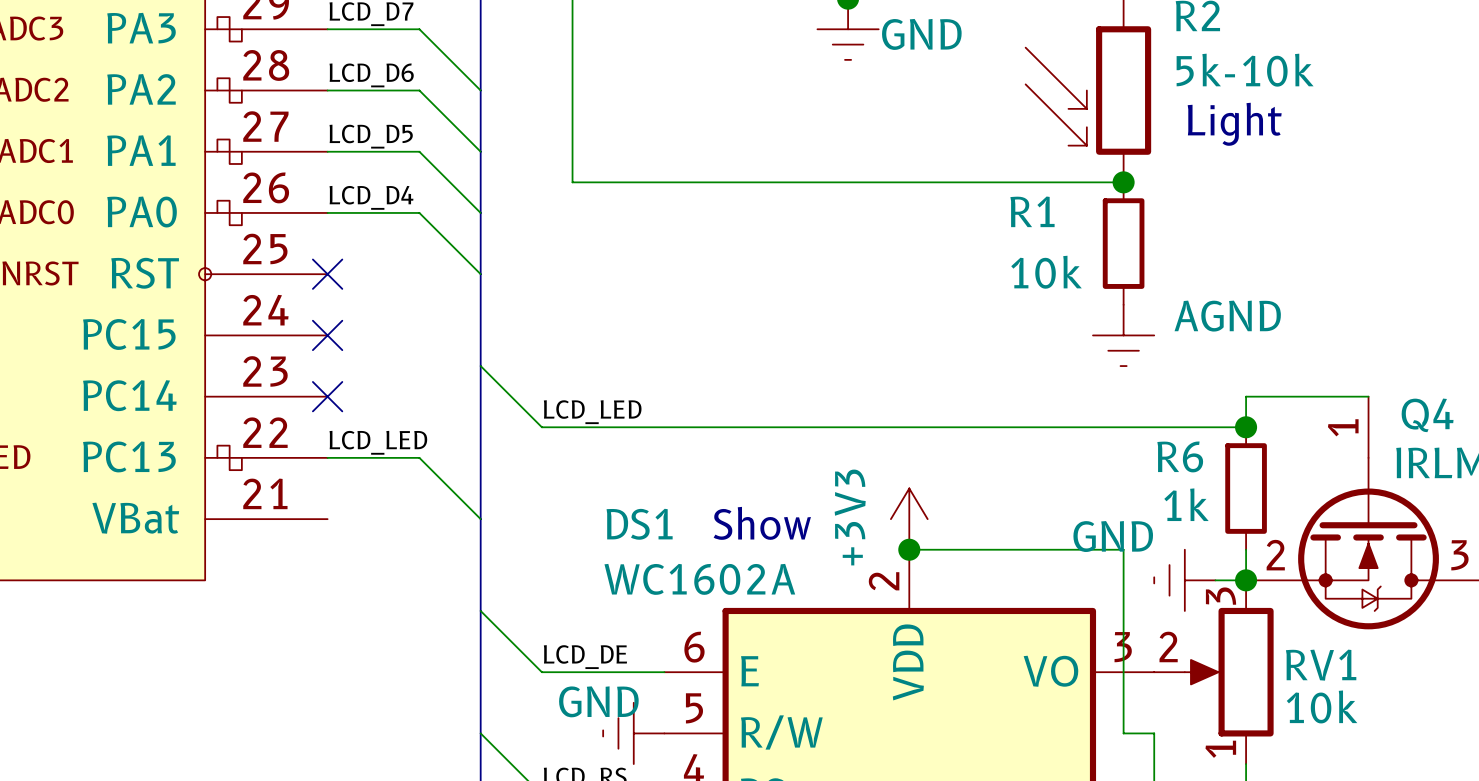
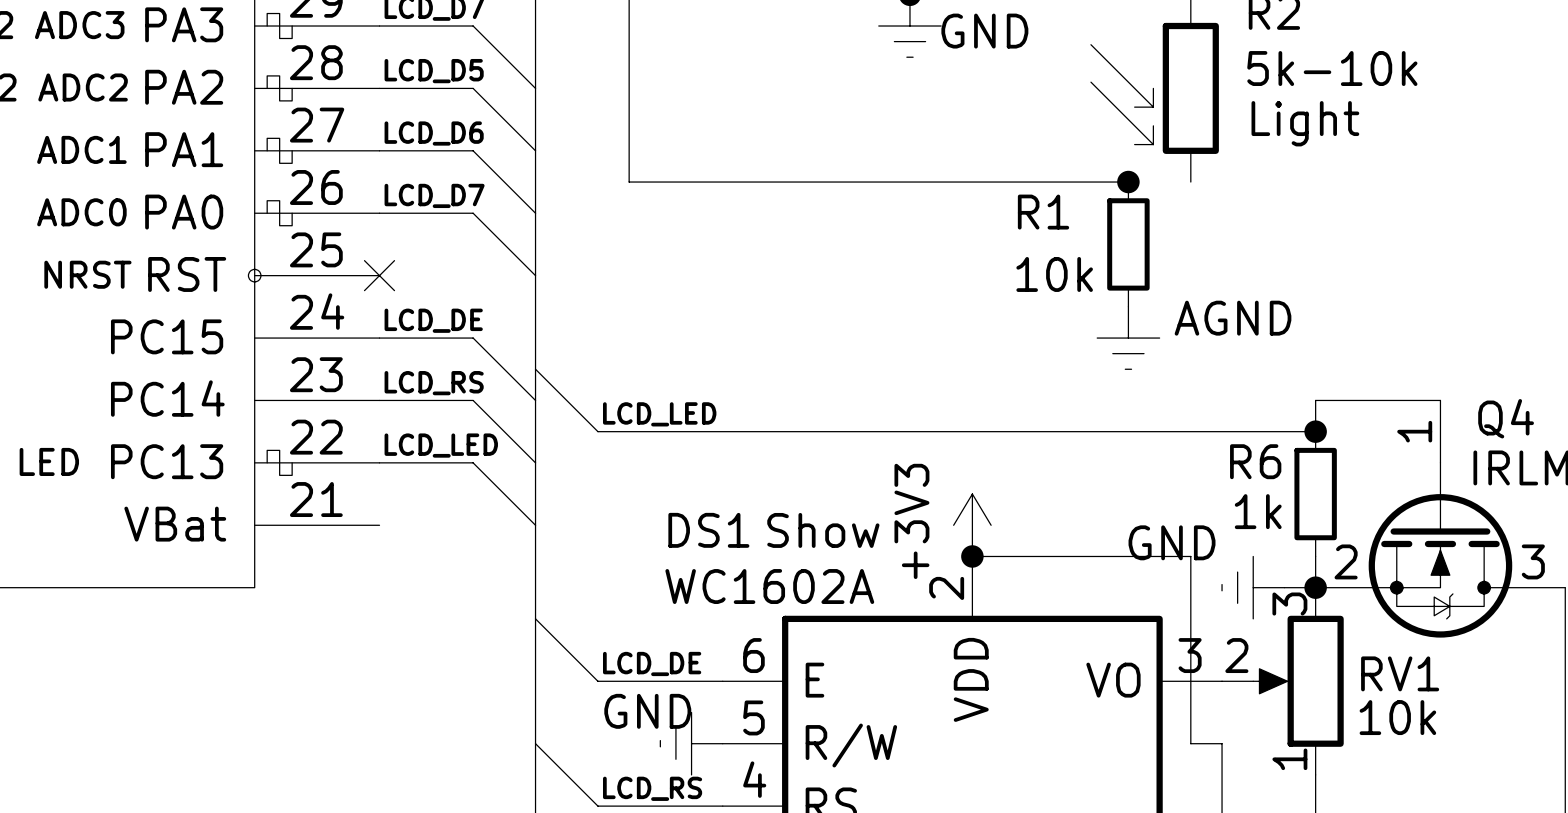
label: LCD_D6 (371, 75) -> LCD_D5 (434, 71)
label: LCD_D5 (371, 136) -> LCD_D6 (434, 133)
wire: (1062, 182) (1123, 182) -> none
junction position: (1123, 182) -> (1128, 182)
label: LCD_D4 (371, 197) -> LCD_D7 (434, 195)
R1 position: (1123, 243) -> (1128, 244)
label: none -> LCD_DE (433, 320)
wire: none -> (379, 338) (473, 338) (535, 400)
no-connect mark: (327, 335) -> none
power symbol position: AGND (1123, 335) -> AGND (1128, 338)
label: none -> LCD_RS (434, 383)
wire: none -> (379, 400) (473, 400) (535, 462)
no-connect mark: (327, 396) -> none

